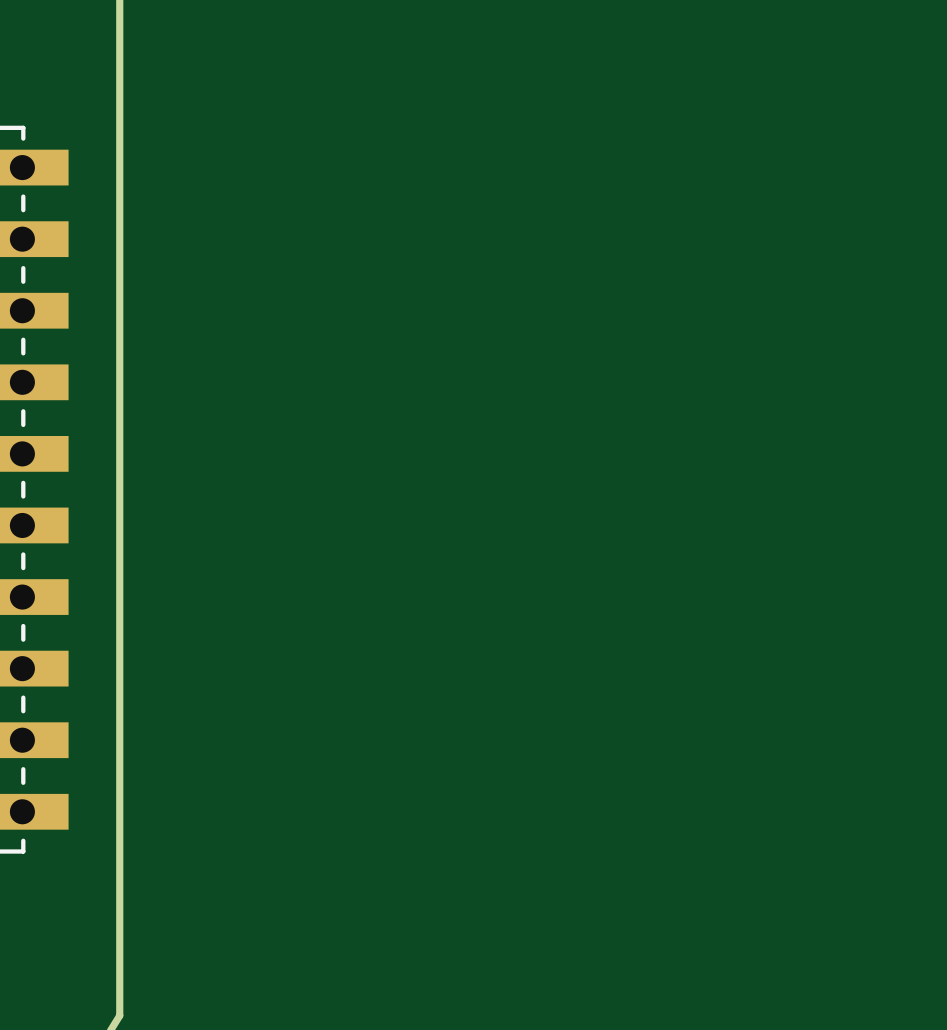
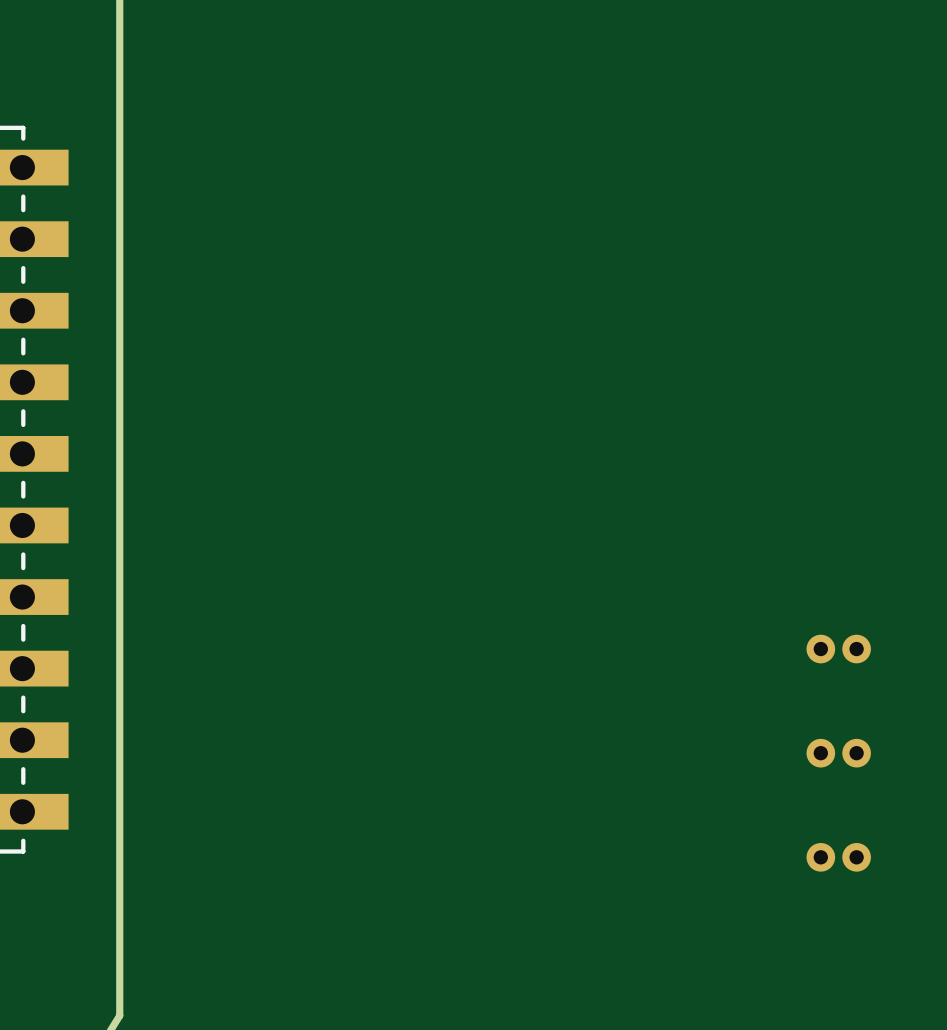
part: none -> (838, 649)
part: none -> (838, 753)
part: none -> (838, 857)

